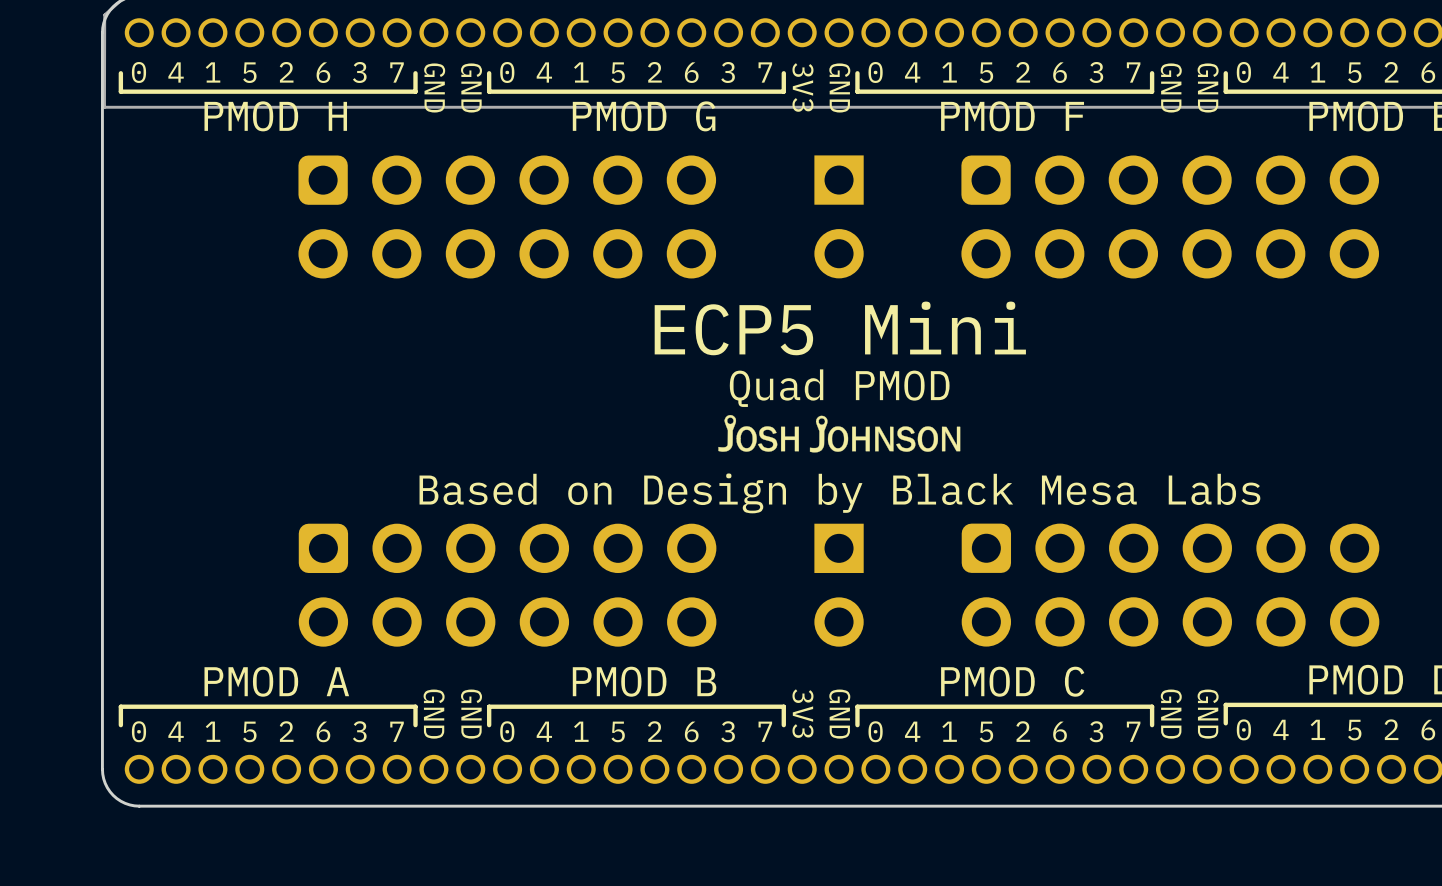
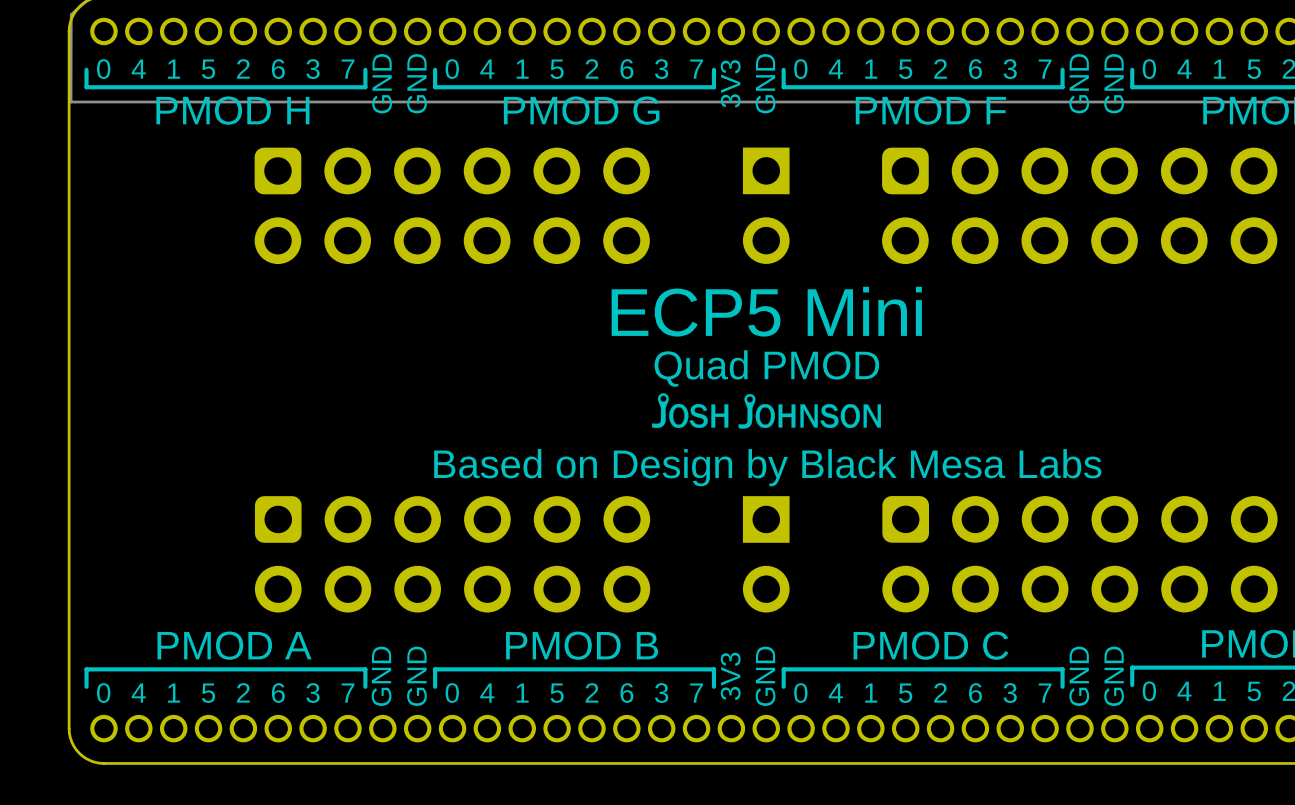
text rotation: 0° (434, 87) -> 180° (382, 83)
text rotation: 0° (471, 87) -> 180° (416, 83)
text rotation: 0° (802, 87) -> 180° (730, 83)
text rotation: 0° (839, 87) -> 180° (765, 83)
text rotation: 0° (1171, 87) -> 180° (1079, 83)
text rotation: 0° (1208, 87) -> 180° (1114, 83)
text rotation: 0° (802, 713) -> 180° (730, 676)
text rotation: 0° (434, 714) -> 180° (381, 676)
text rotation: 0° (471, 714) -> 180° (416, 676)
text rotation: 0° (839, 714) -> 180° (765, 676)
text rotation: 0° (1171, 714) -> 180° (1079, 676)
text rotation: 0° (1208, 714) -> 180° (1114, 676)

